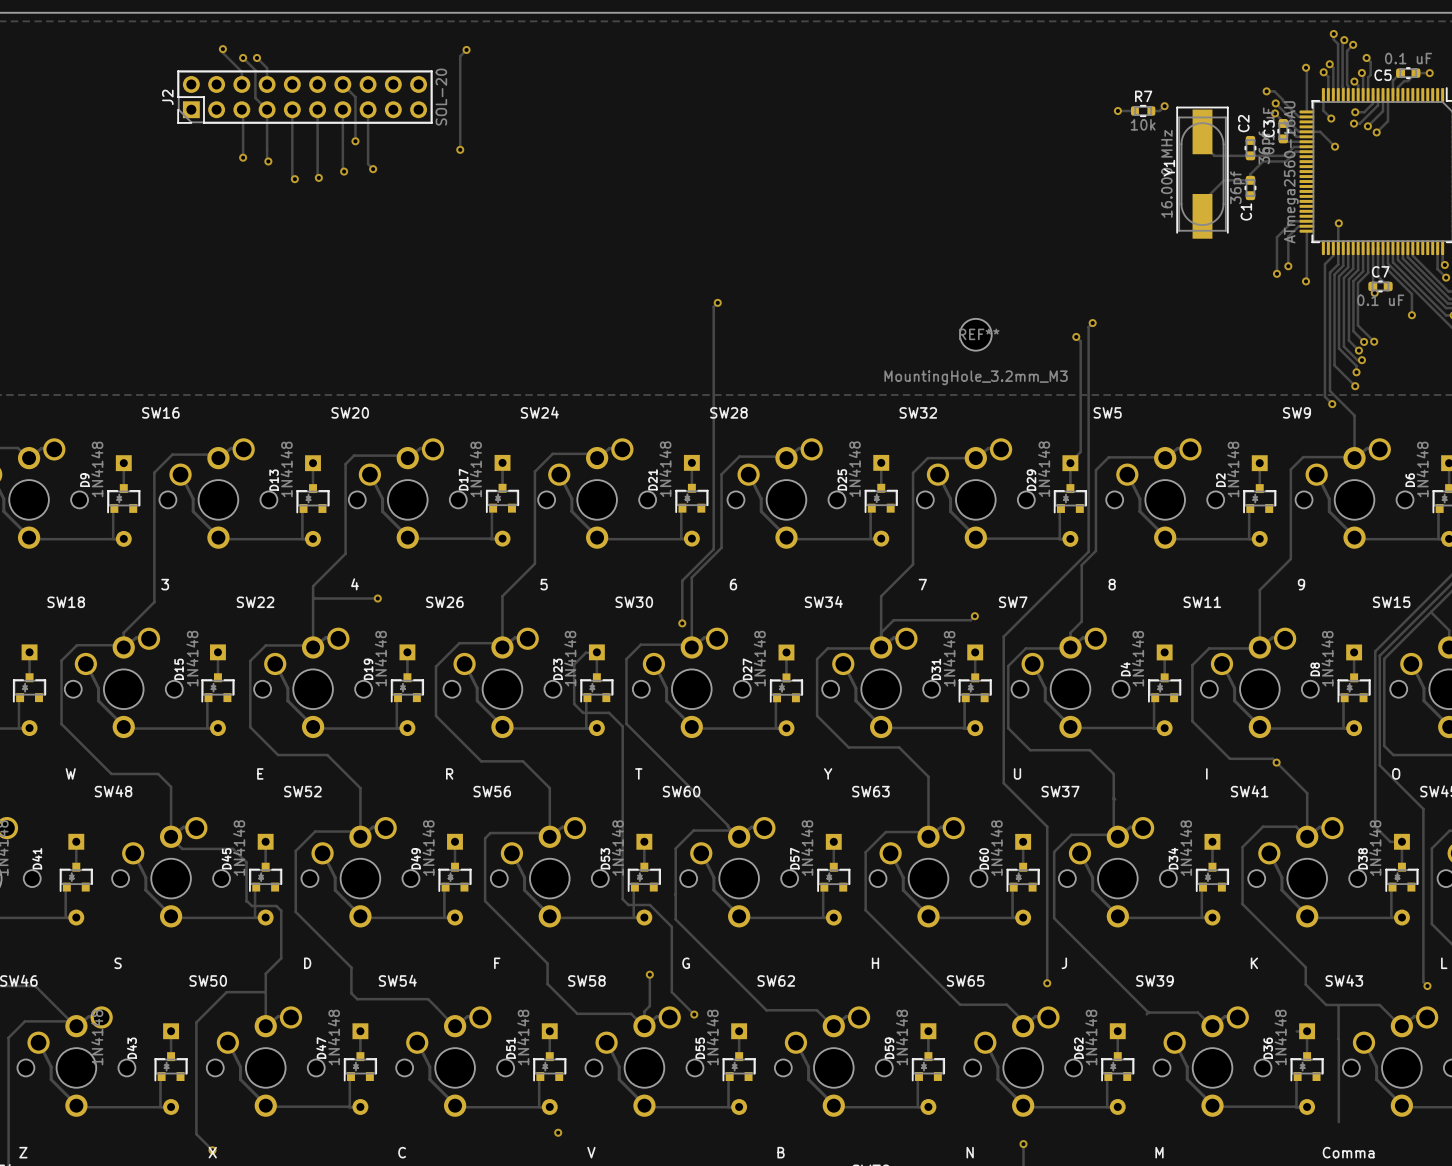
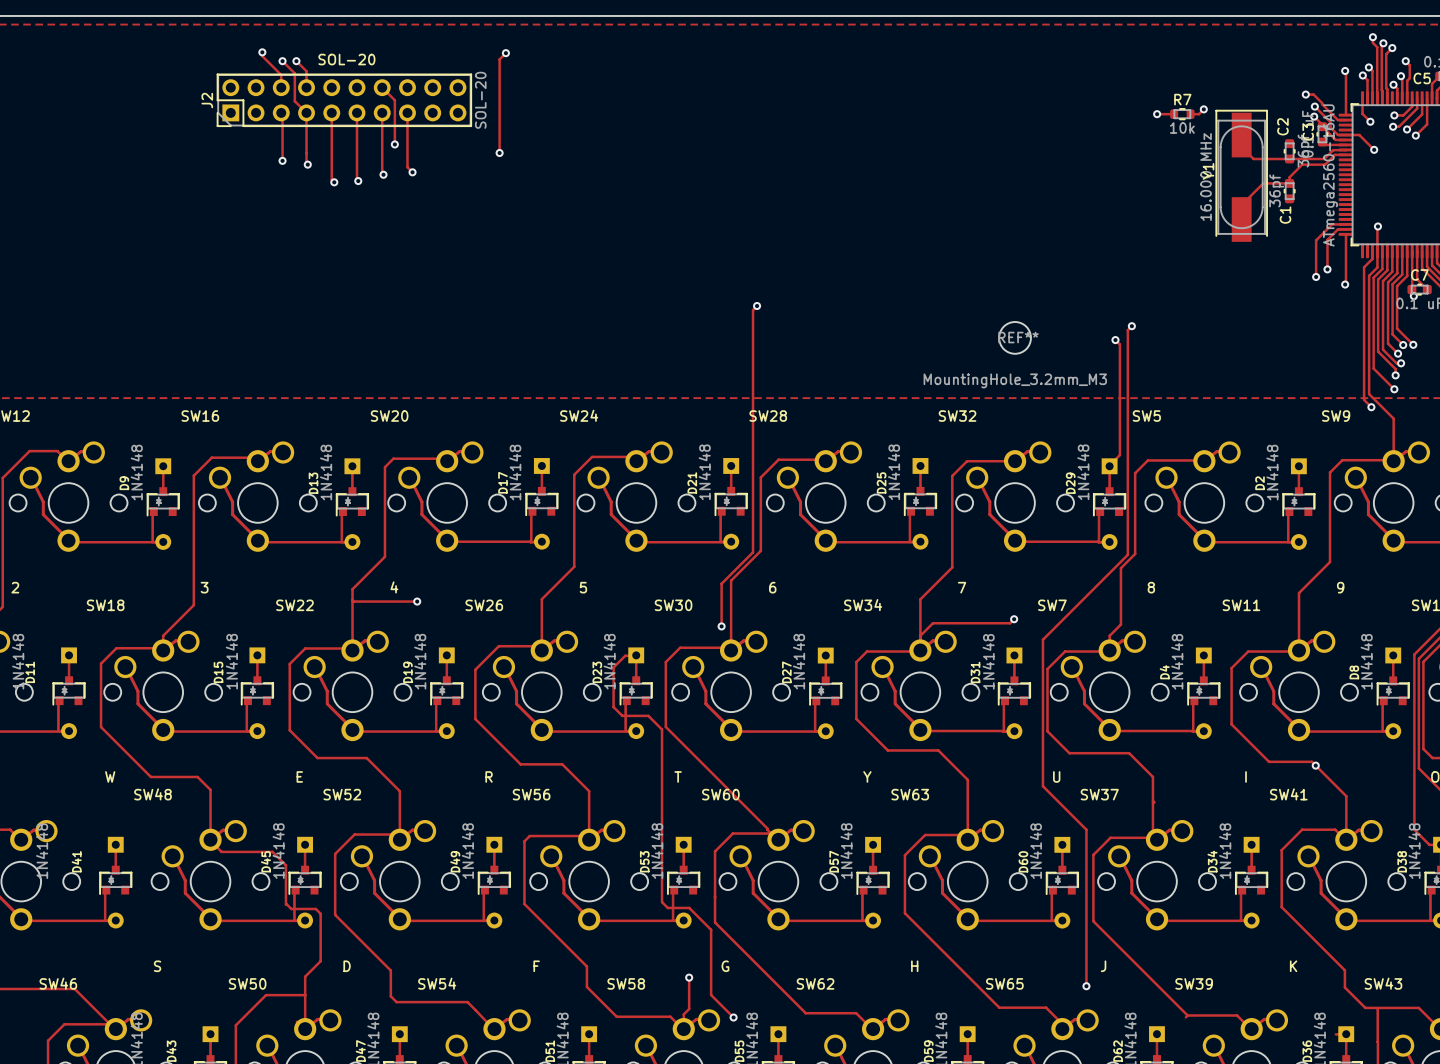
text: none -> SOL-20 (346, 59)

